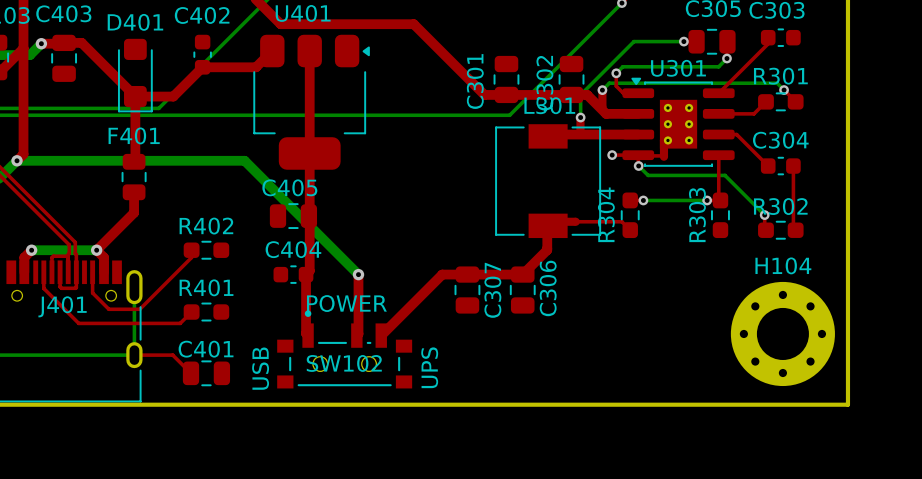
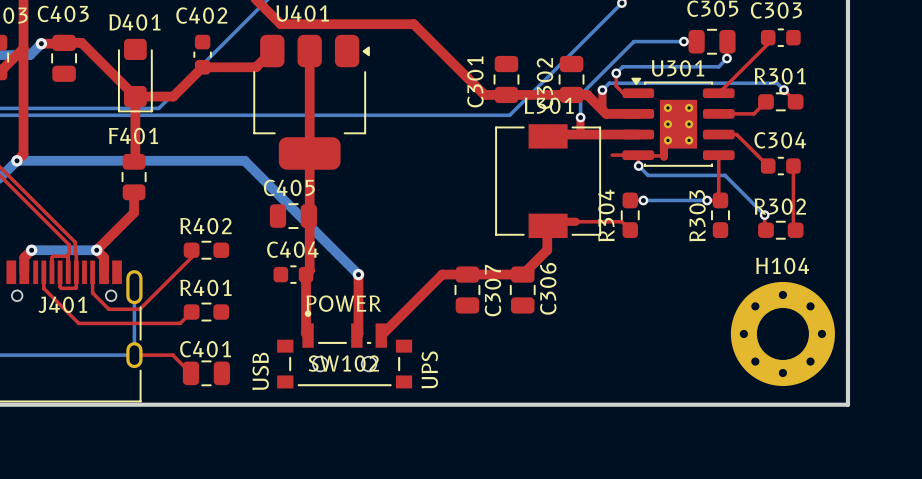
via: (612, 155) -> none

